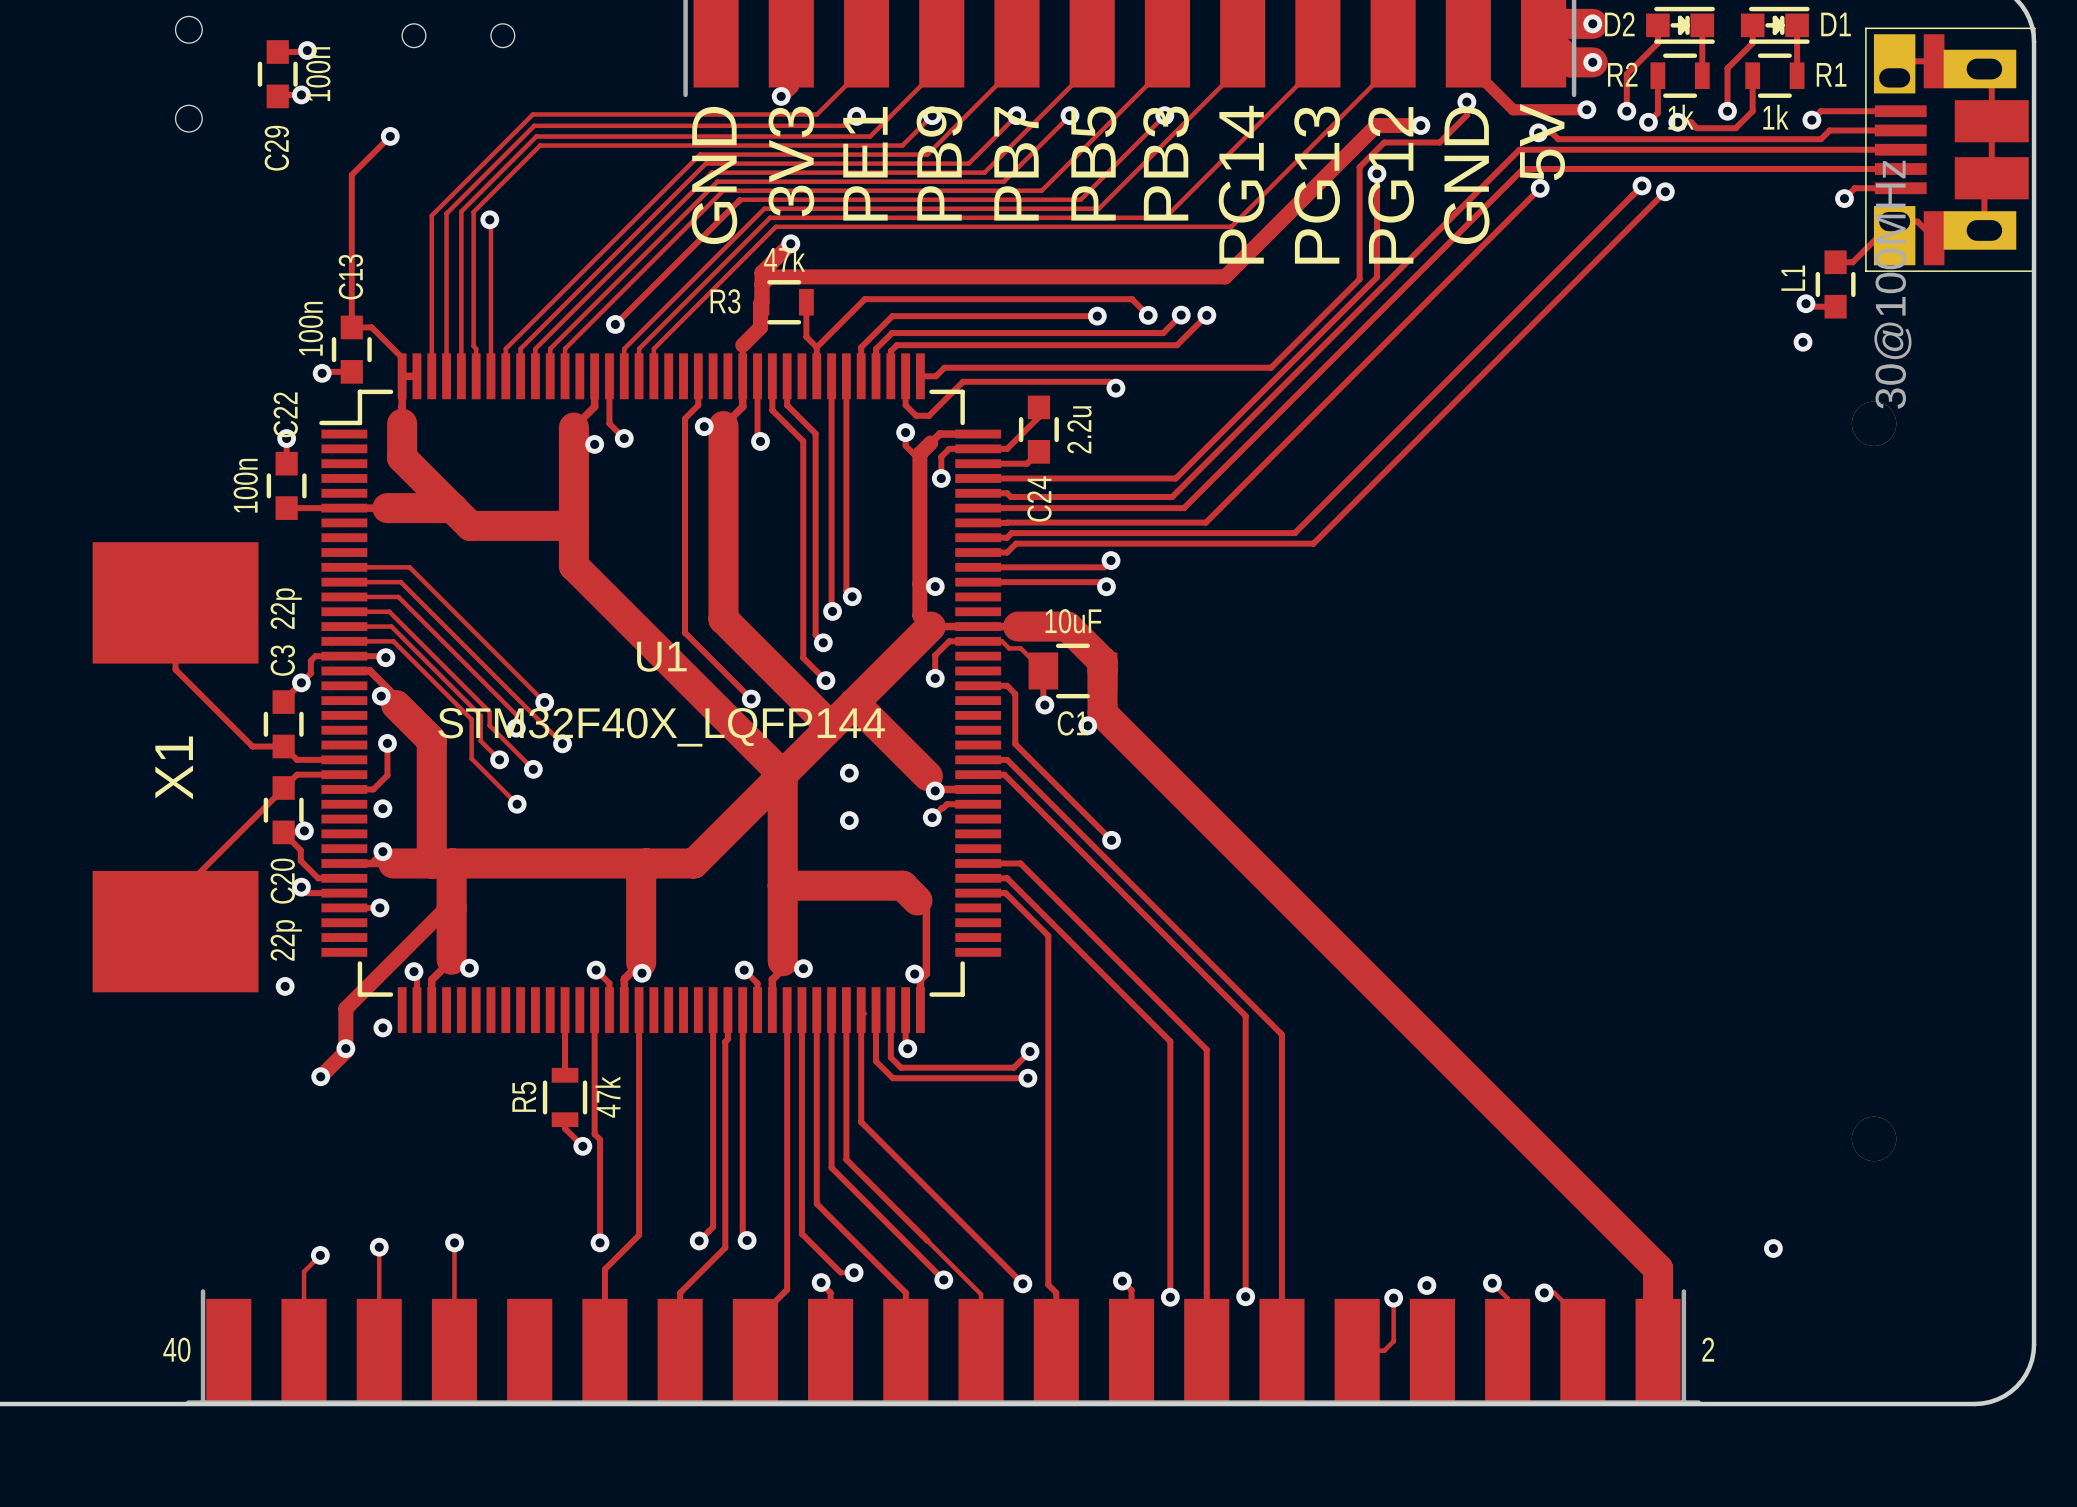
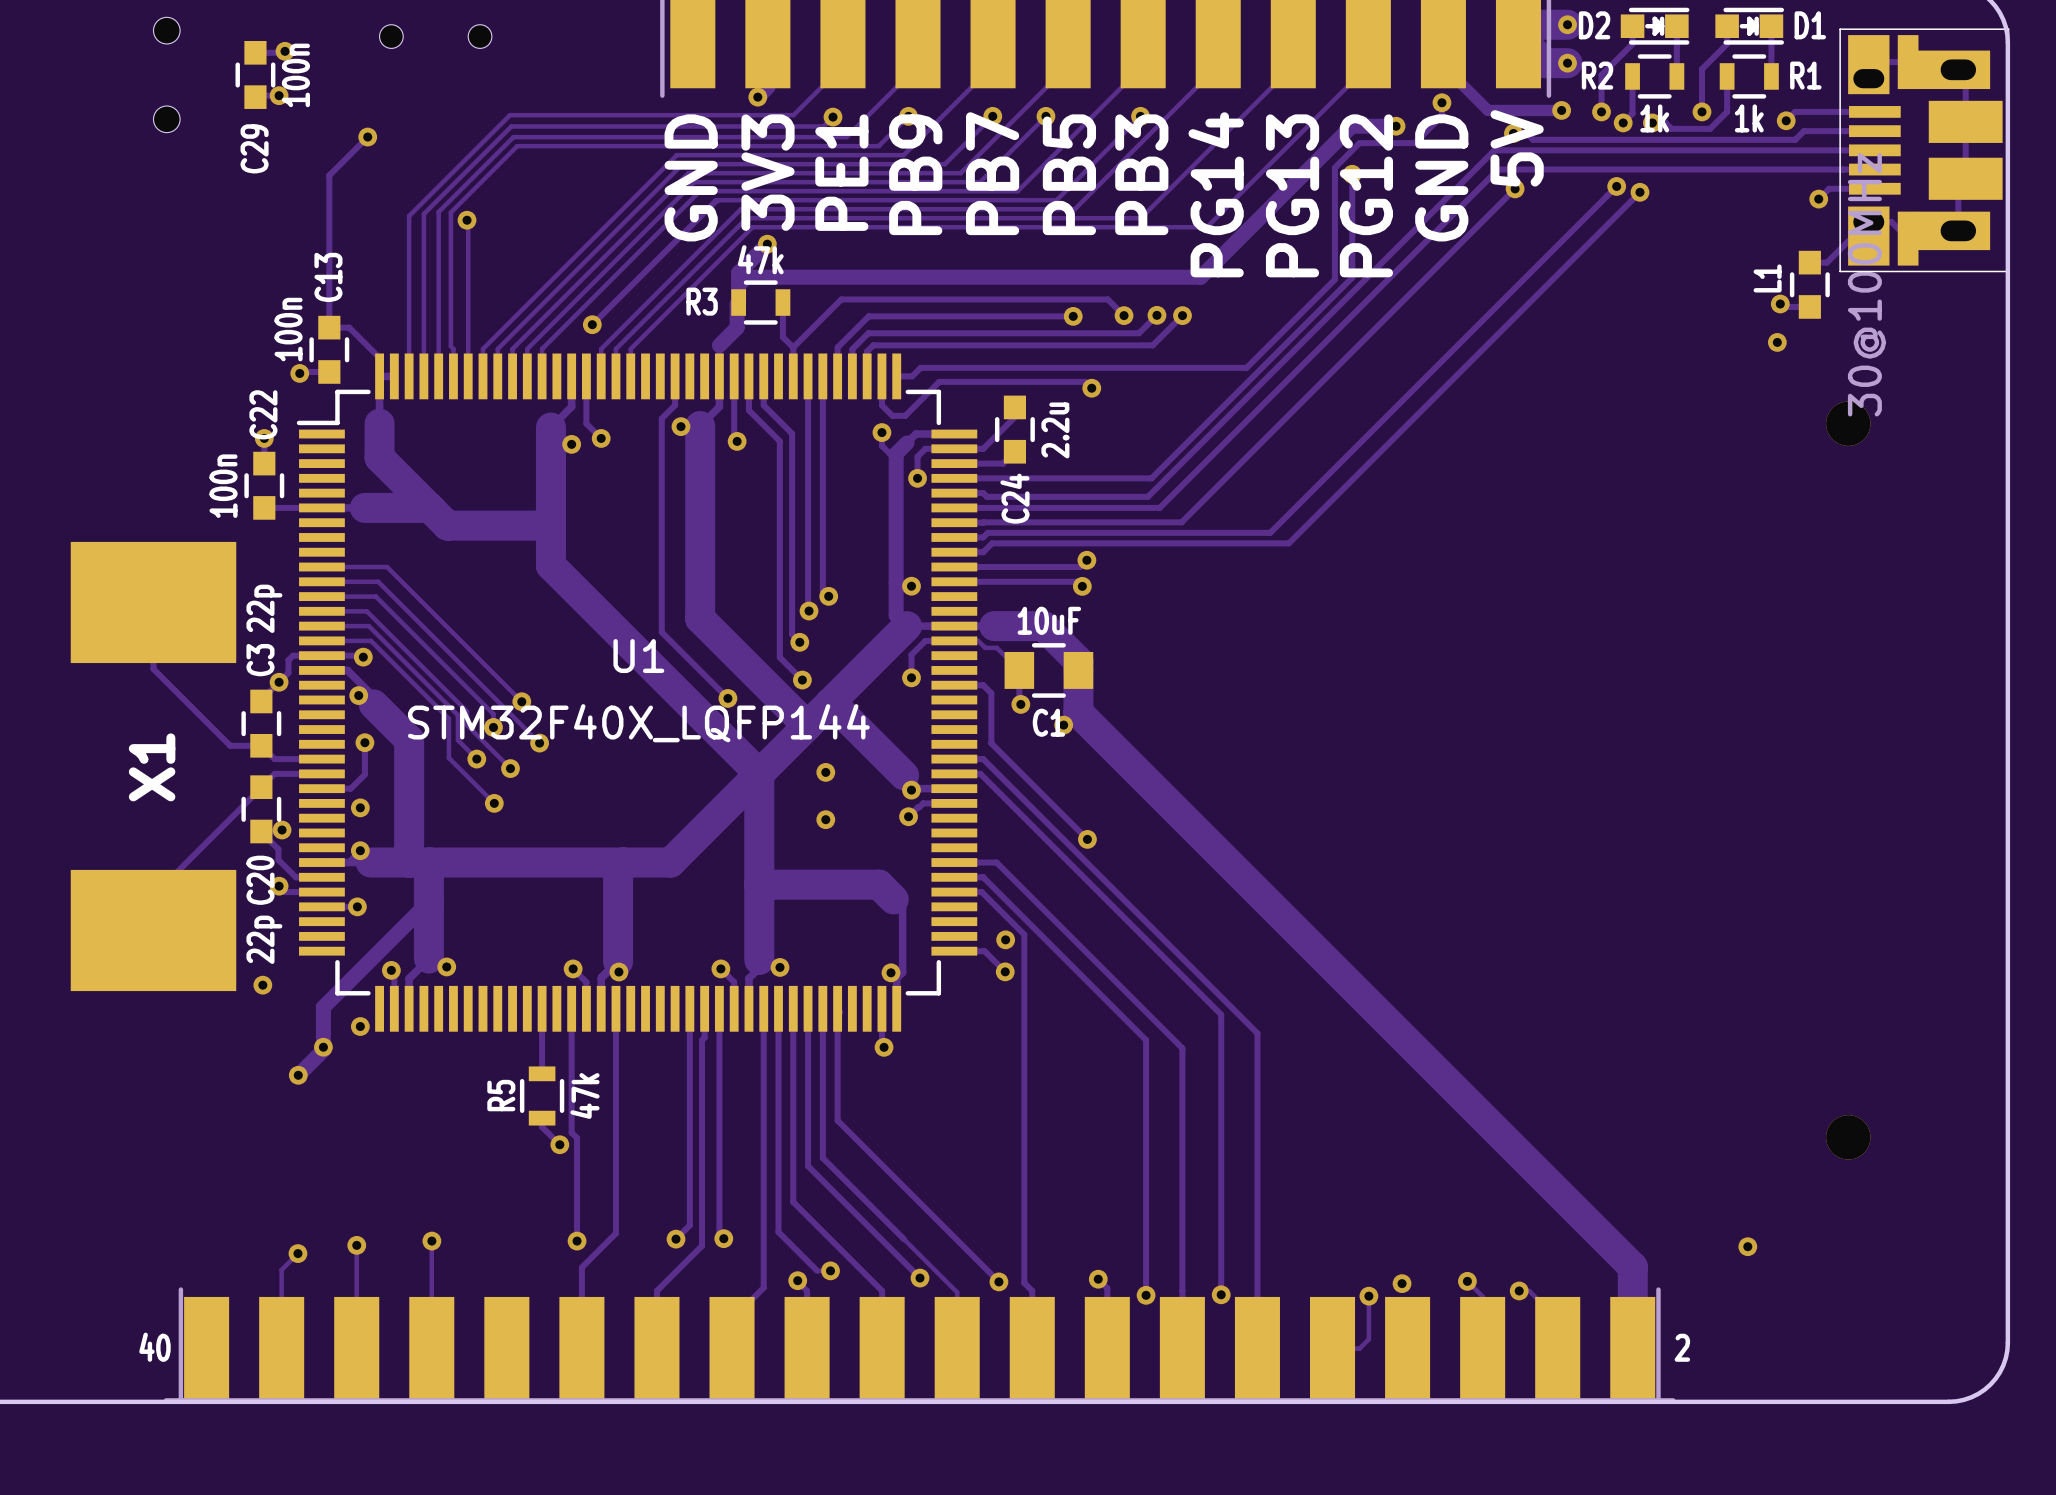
via: none -> (1005, 939)
track: none -> (954, 951) (984, 951) (1005, 971)
via: none -> (1005, 971)
track: (876, 1010) (876, 1061) (892, 1078) (1027, 1078) -> none
track: (890, 1010) (890, 1057) (901, 1067) (1013, 1067) (1030, 1051) -> none
via: (1030, 1051) -> none
via: (1027, 1078) -> none

